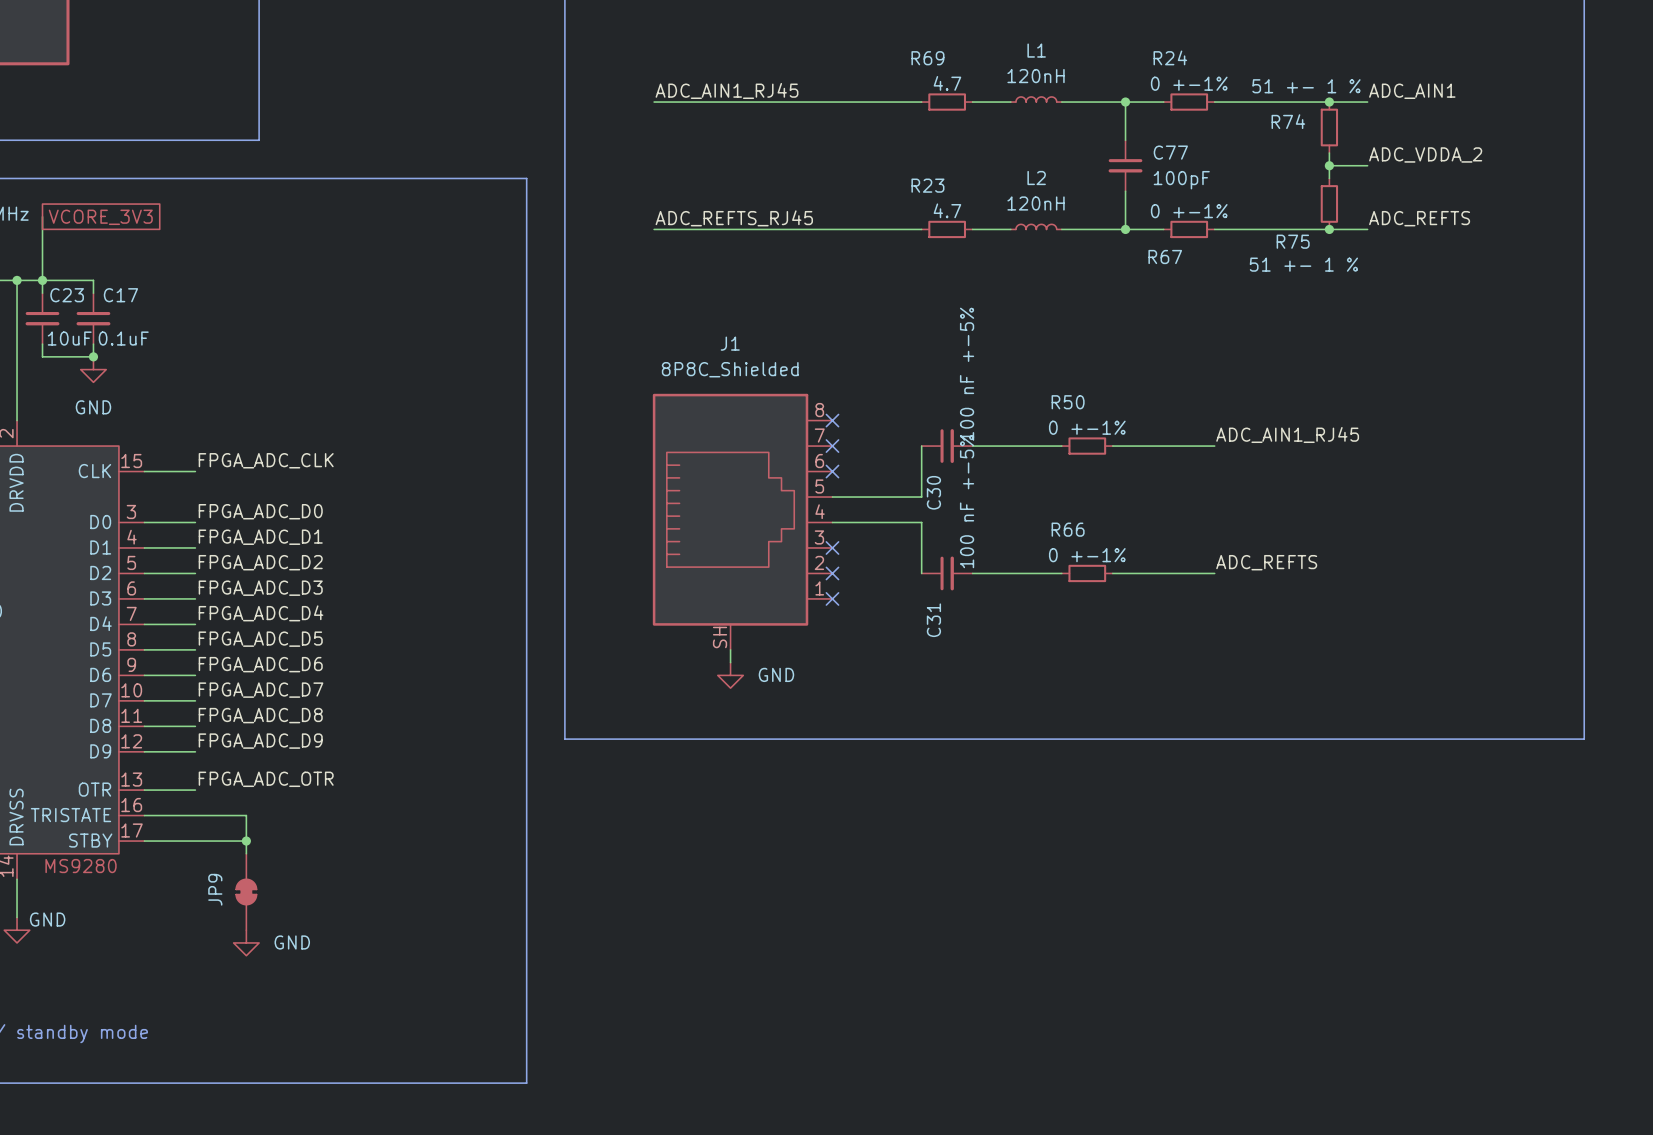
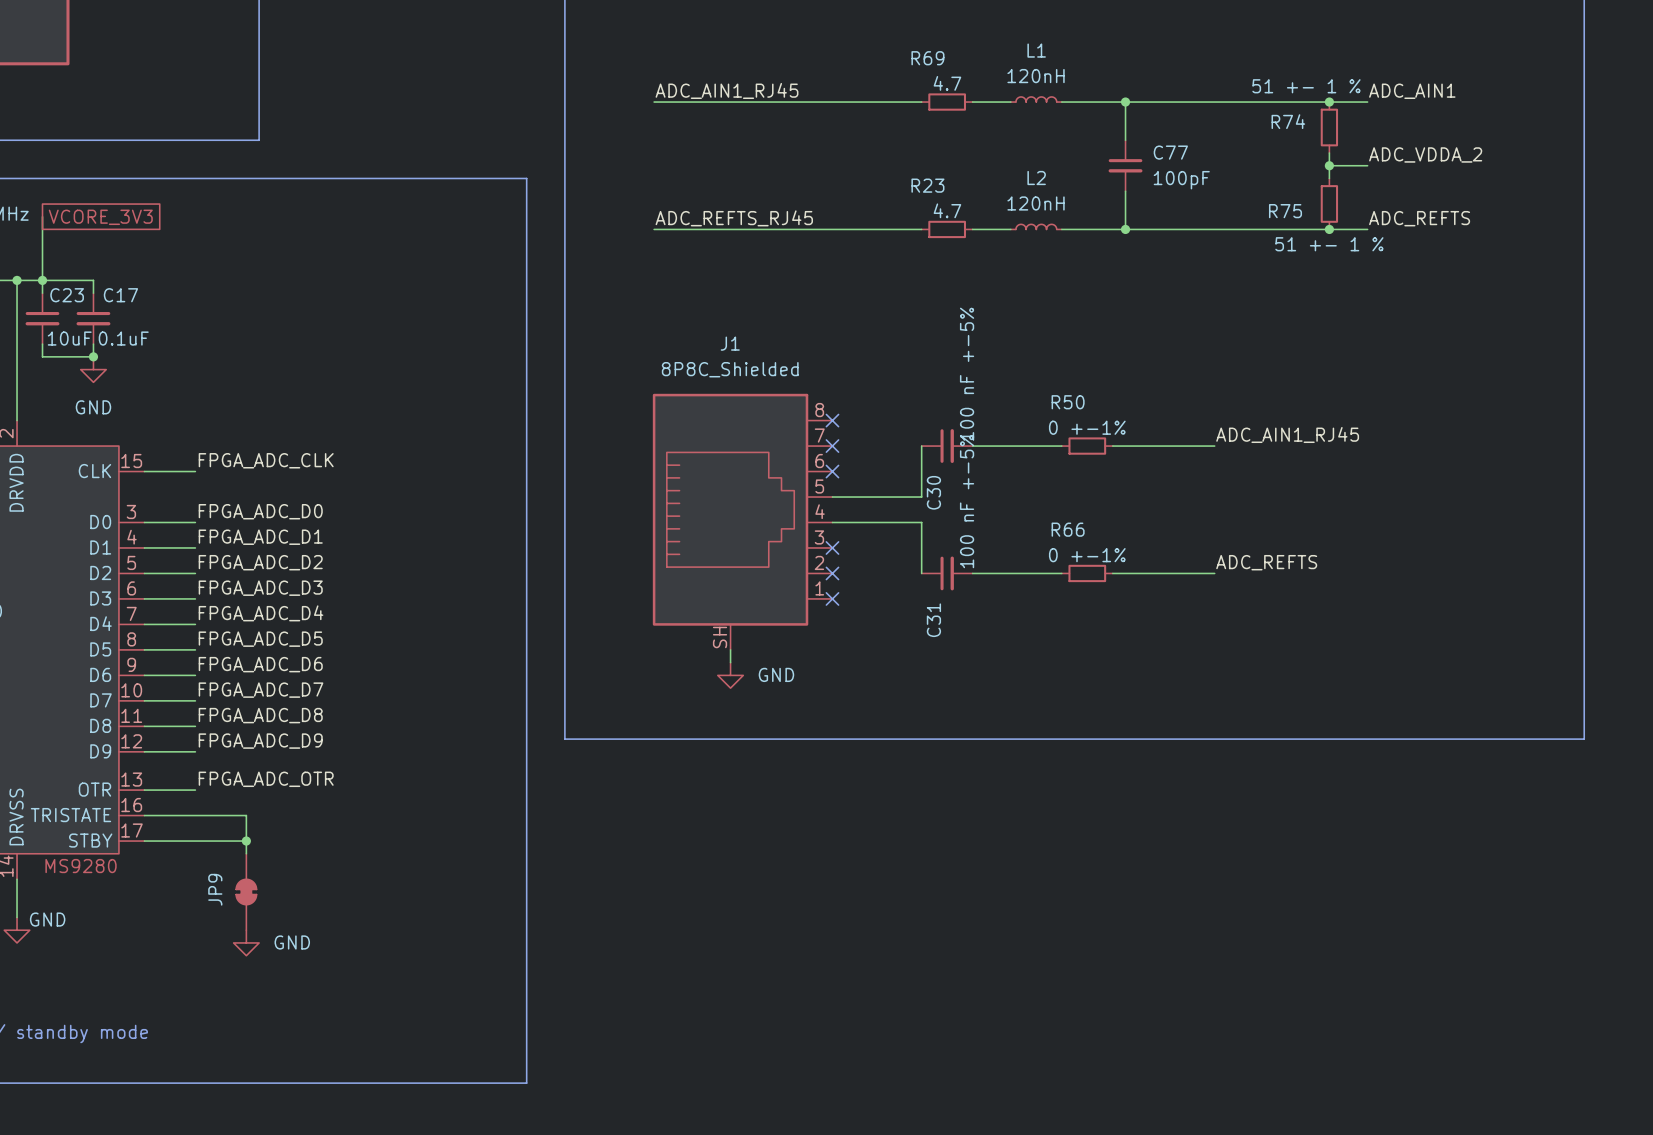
wire: none -> (1163, 102) (1214, 102)
R24: 0 +-1% (1189, 102) -> none
wire: none -> (1163, 229) (1214, 229)
R67: 0 +-1% (1189, 229) -> none
R75 name position: R75 (1293, 241) -> R75 (1285, 211)
R75 value position: 51 +- 1 % (1303, 264) -> 51 +- 1 % (1329, 244)

